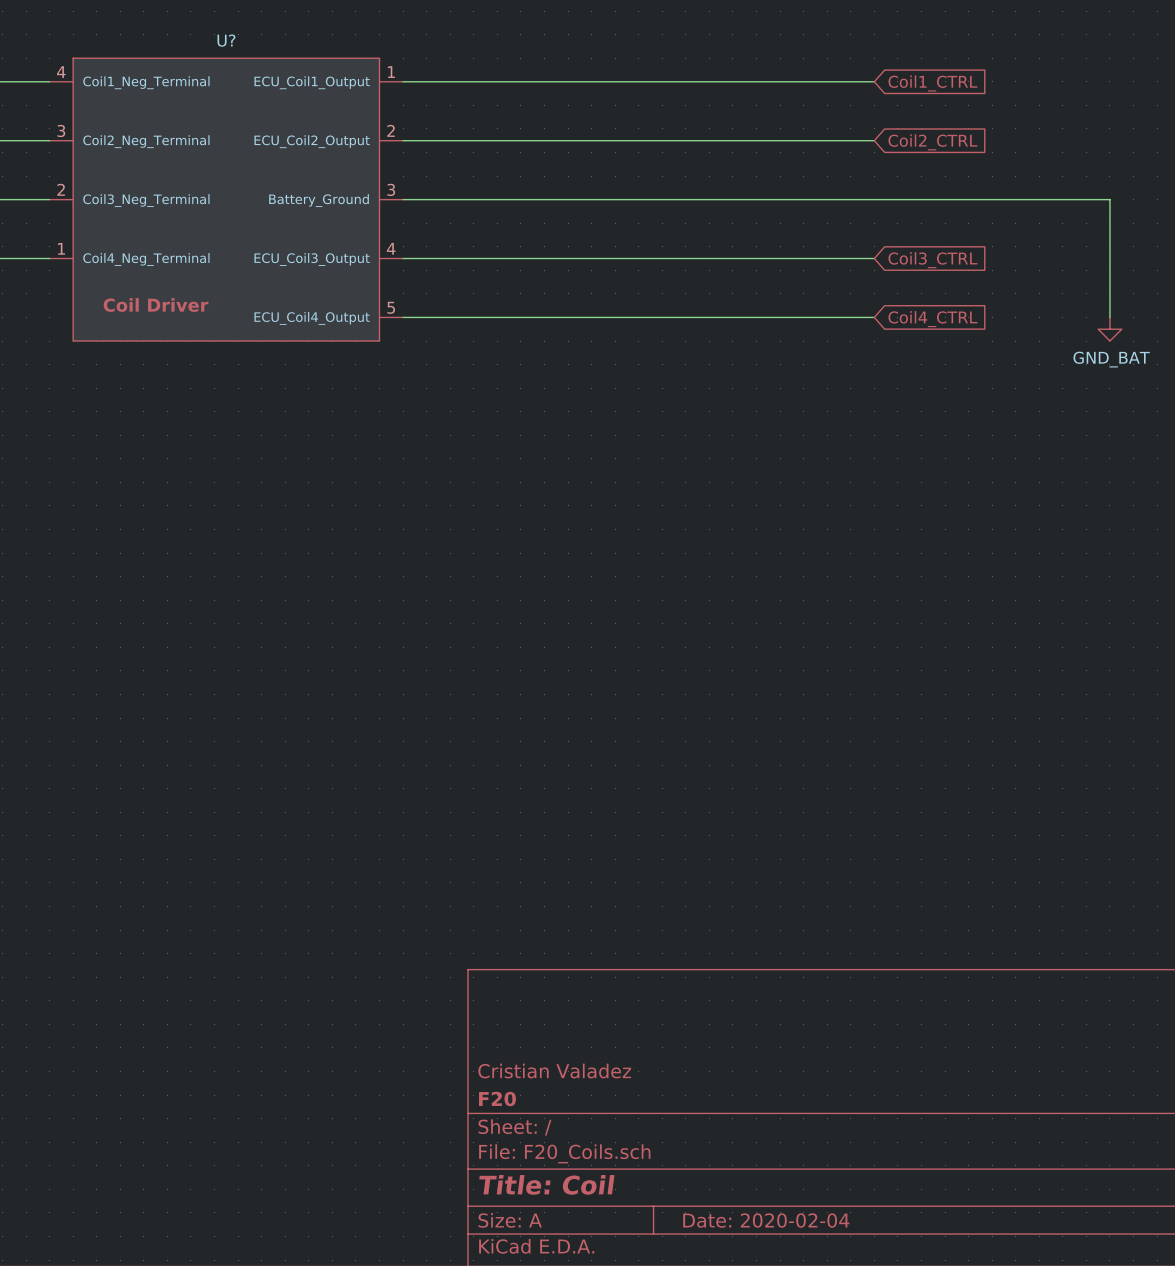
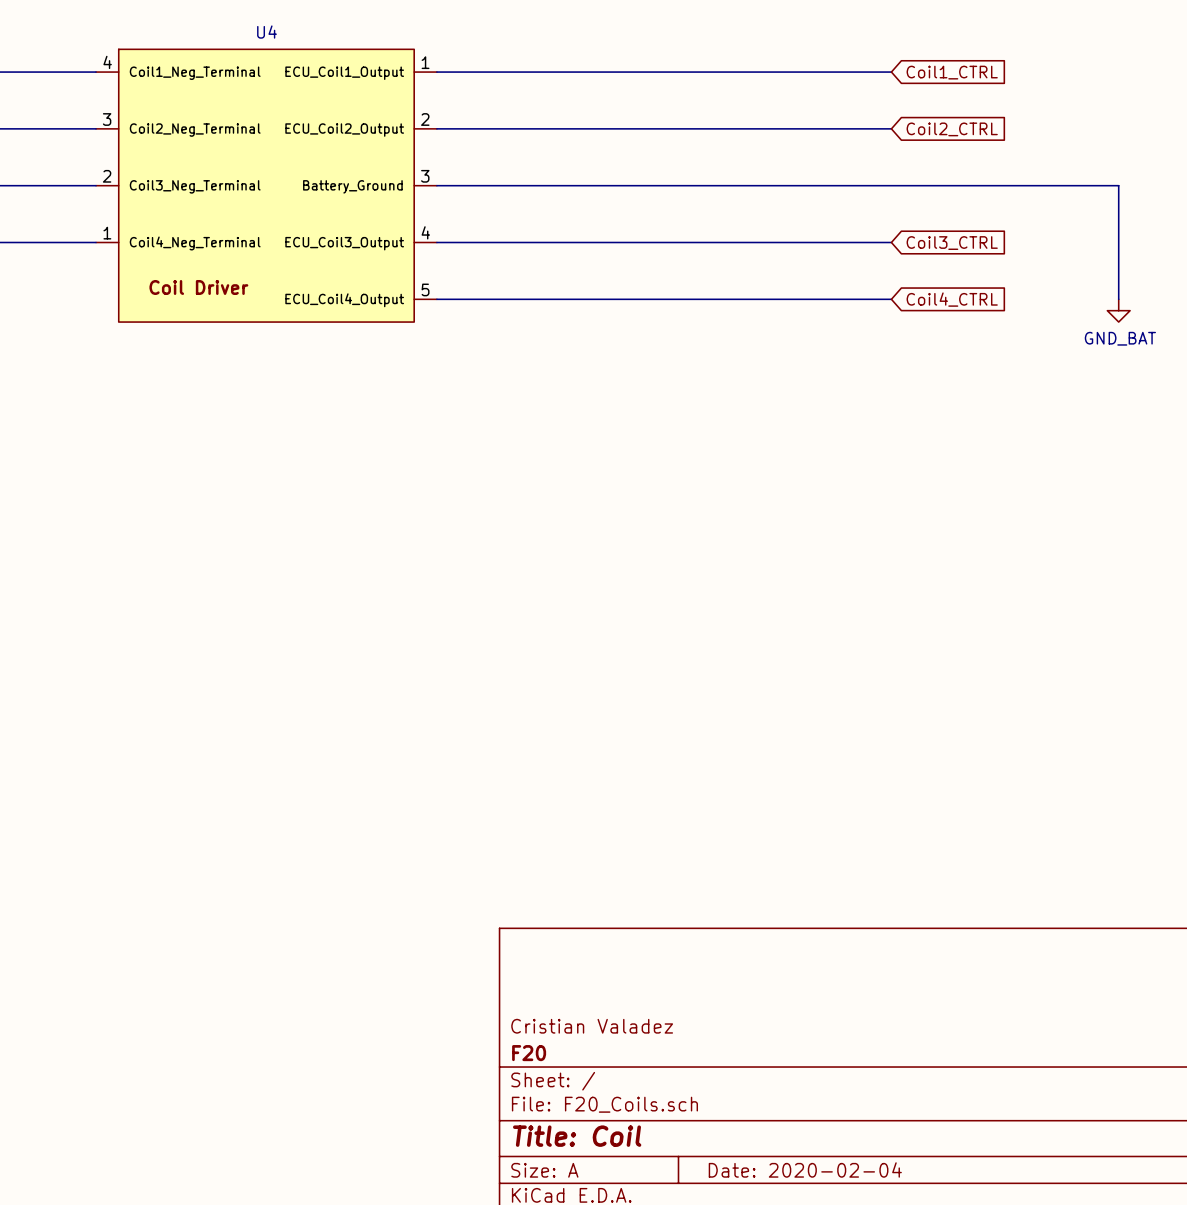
U? name: U? (226, 40) -> U4 (267, 32)

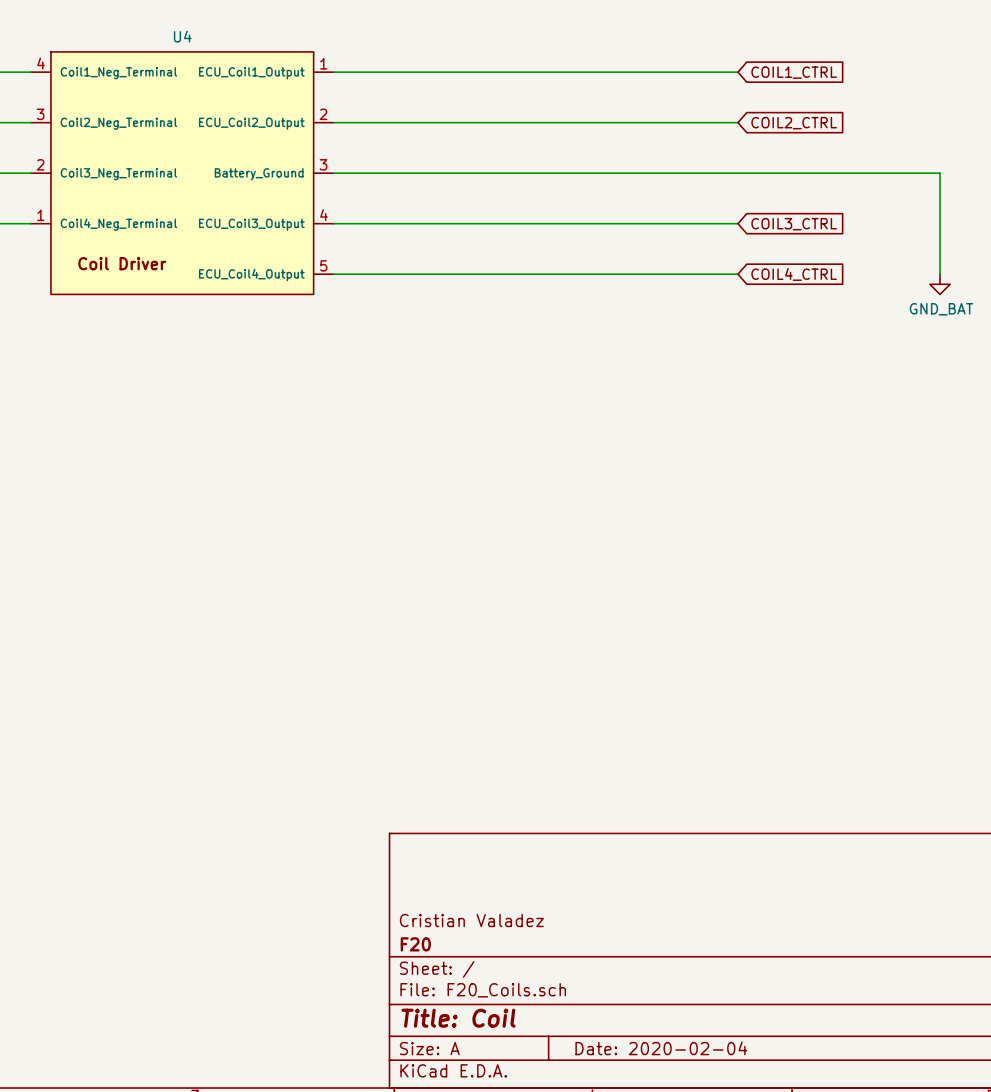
global label: Coil1_CTRL (952, 72) -> COIL1_CTRL (794, 72)
global label: Coil2_CTRL (952, 129) -> COIL2_CTRL (794, 123)
global label: Coil3_CTRL (952, 243) -> COIL3_CTRL (794, 224)
global label: Coil4_CTRL (952, 299) -> COIL4_CTRL (794, 274)

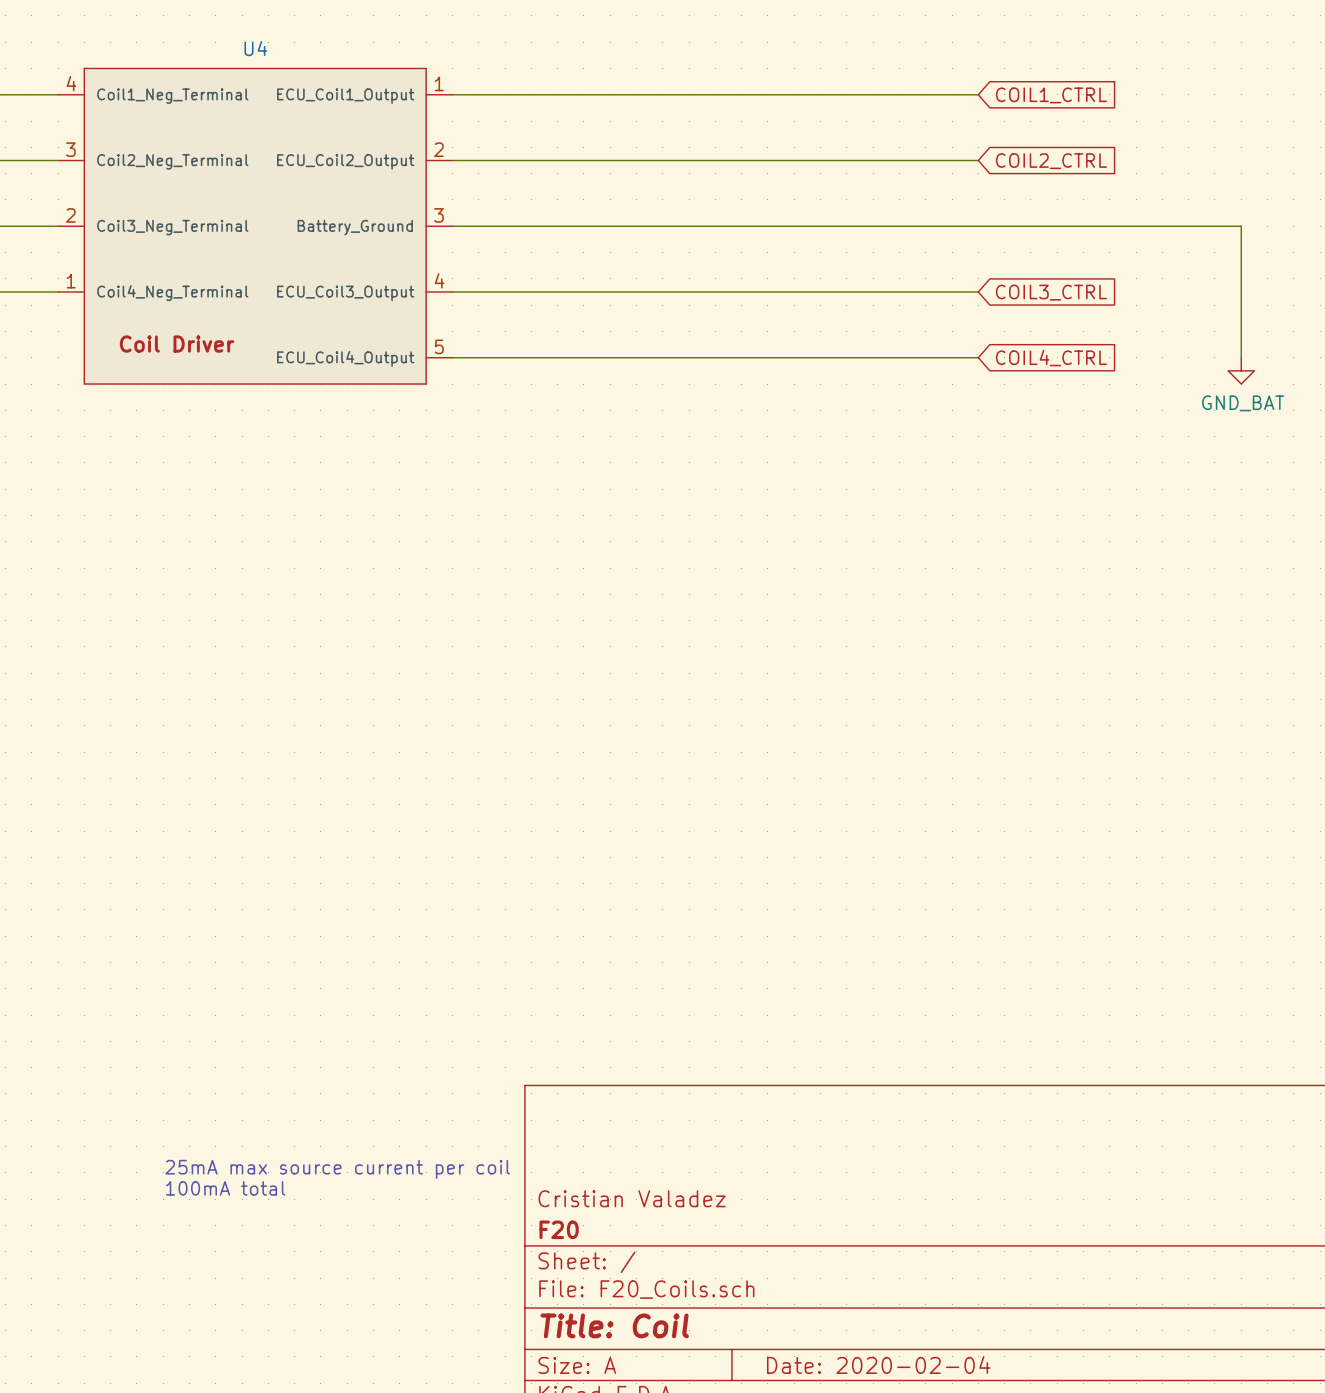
text: none -> 25mA max source current per coil (337, 1169)
text: none -> 100mA total (225, 1188)

